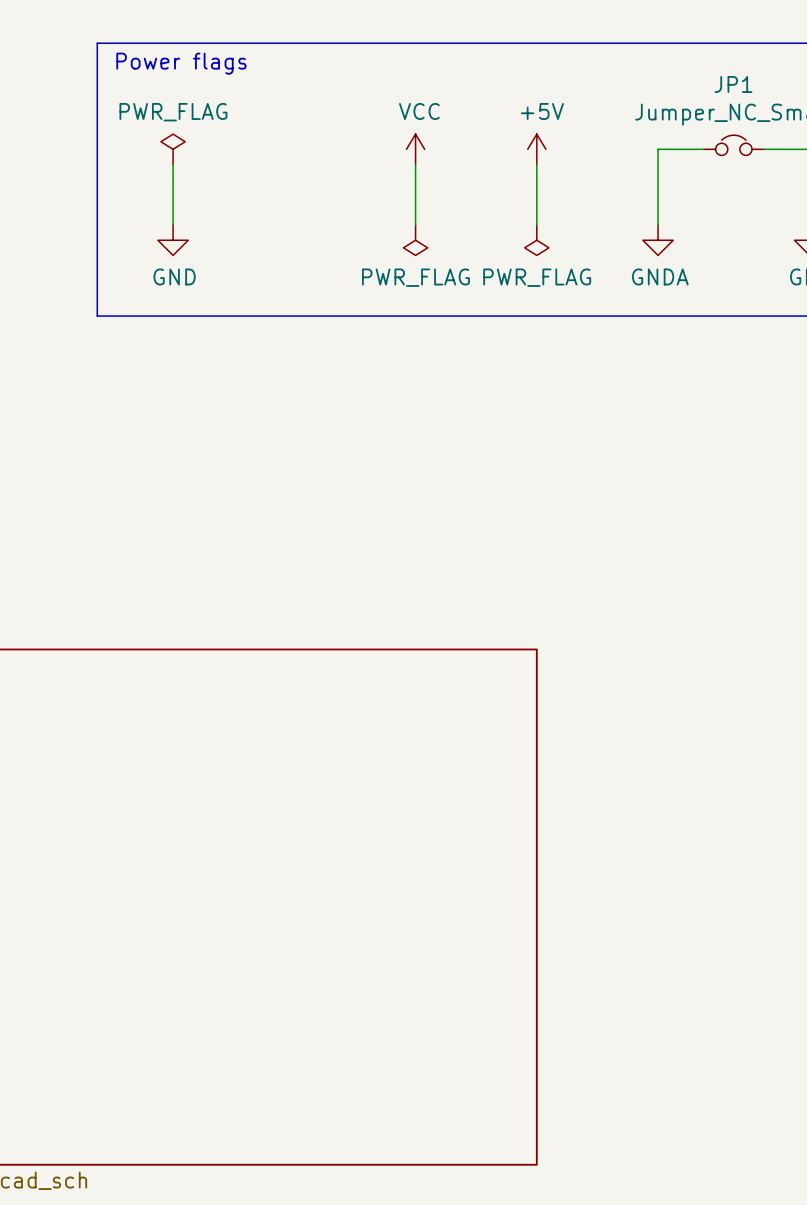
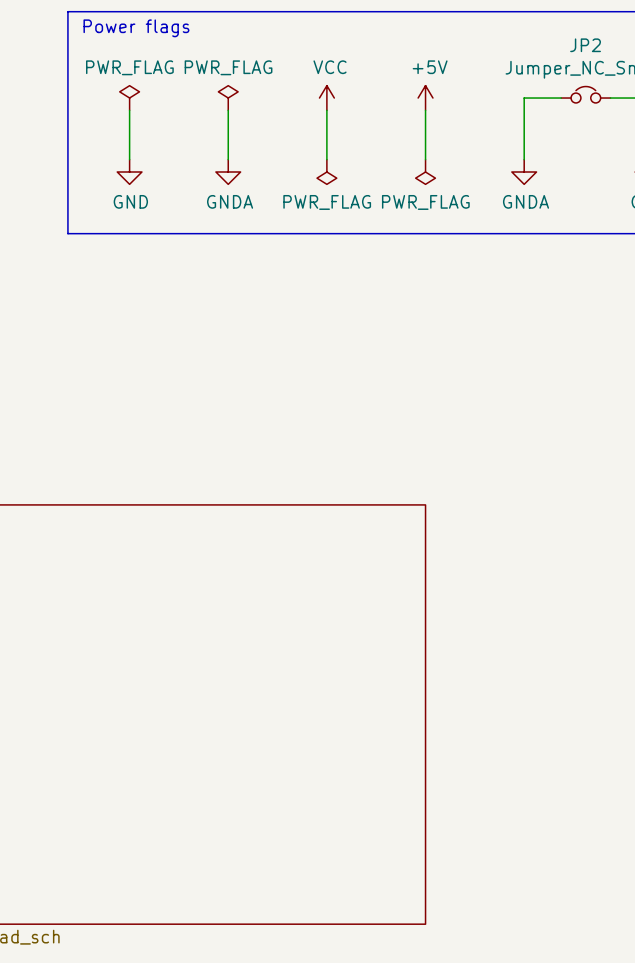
JP1 name: JP1 (733, 84) -> JP2 (585, 45)
power symbol: none -> PWR_FLAG (228, 98)
wire: none -> (228, 110) (228, 159)
power symbol: none -> GNDA (228, 172)

